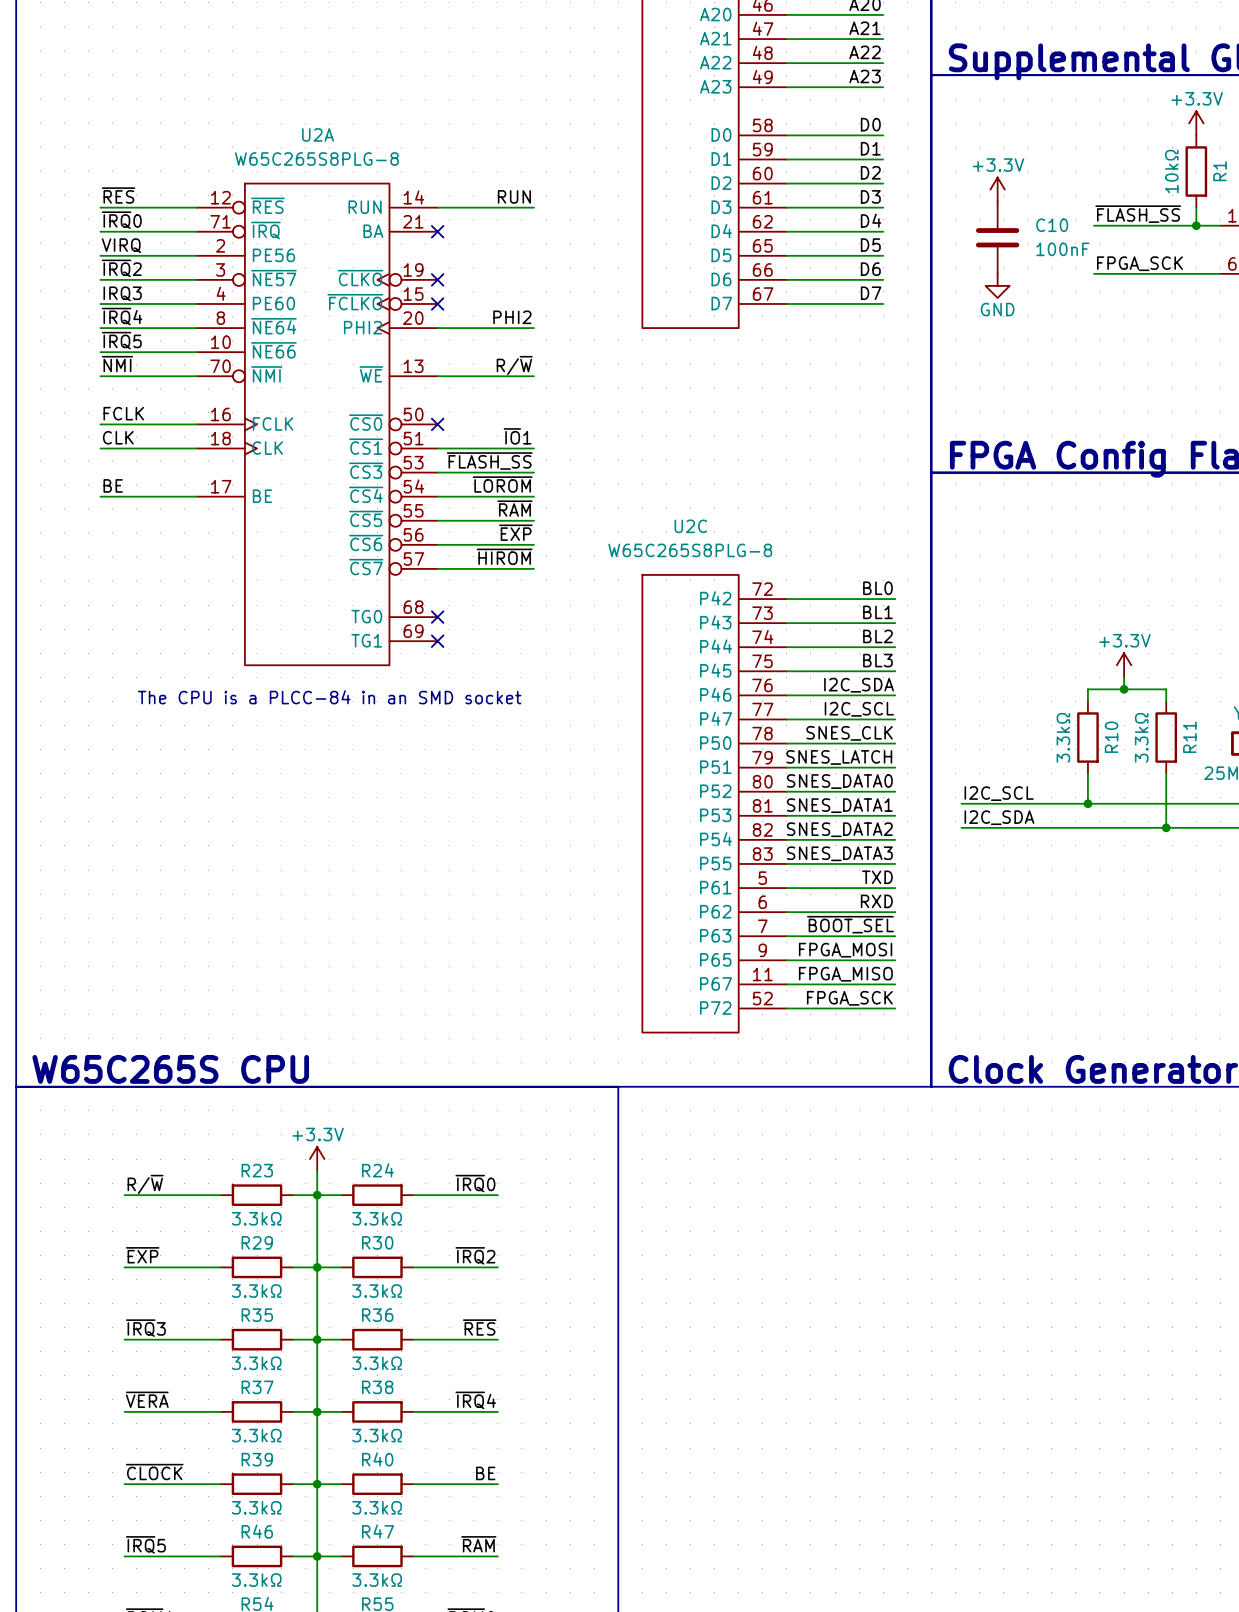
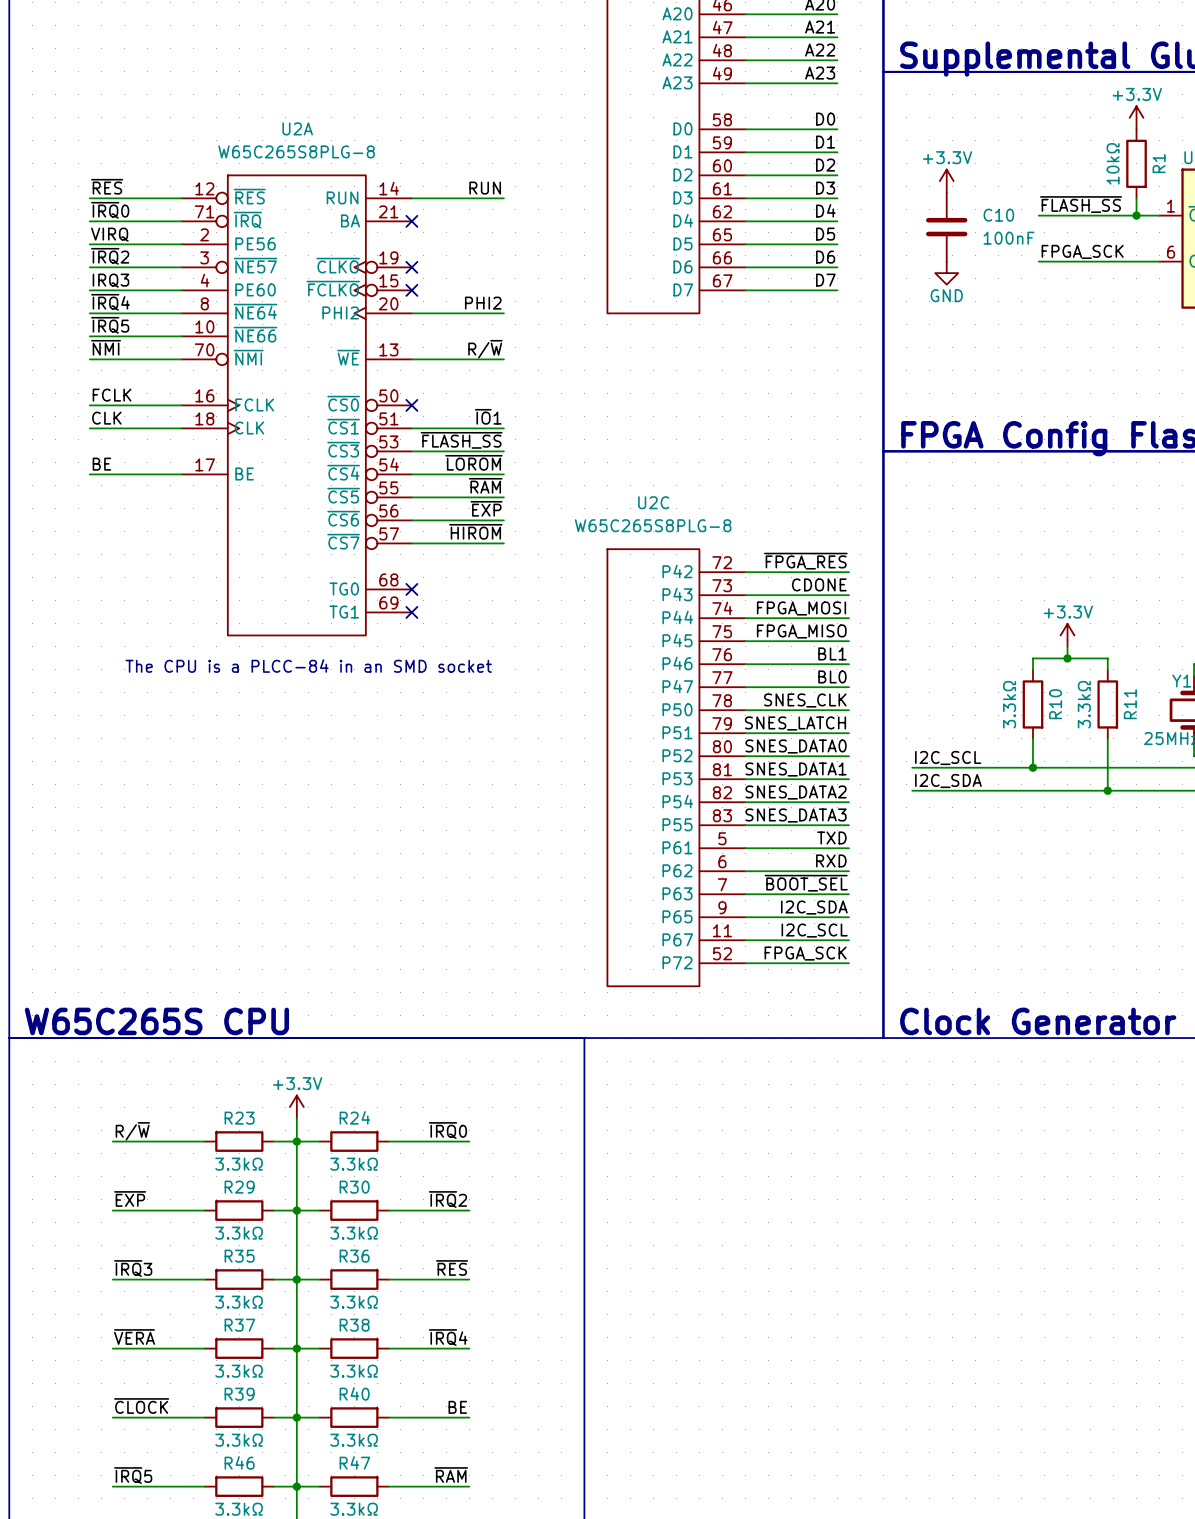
label: BL0 (877, 588) -> ~{FPGA_RES} (805, 561)
label: BL1 (877, 612) -> CDONE (819, 584)
label: BL2 (877, 636) -> FPGA_MOSI (801, 608)
label: BL3 (877, 660) -> FPGA_MISO (801, 631)
label: I2C_SDA (859, 685) -> BL1 (832, 653)
label: I2C_SCL (859, 709) -> BL0 (832, 676)
label: FPGA_MOSI (845, 950) -> I2C_SDA (814, 907)
label: FPGA_MISO (845, 974) -> I2C_SCL (814, 930)

